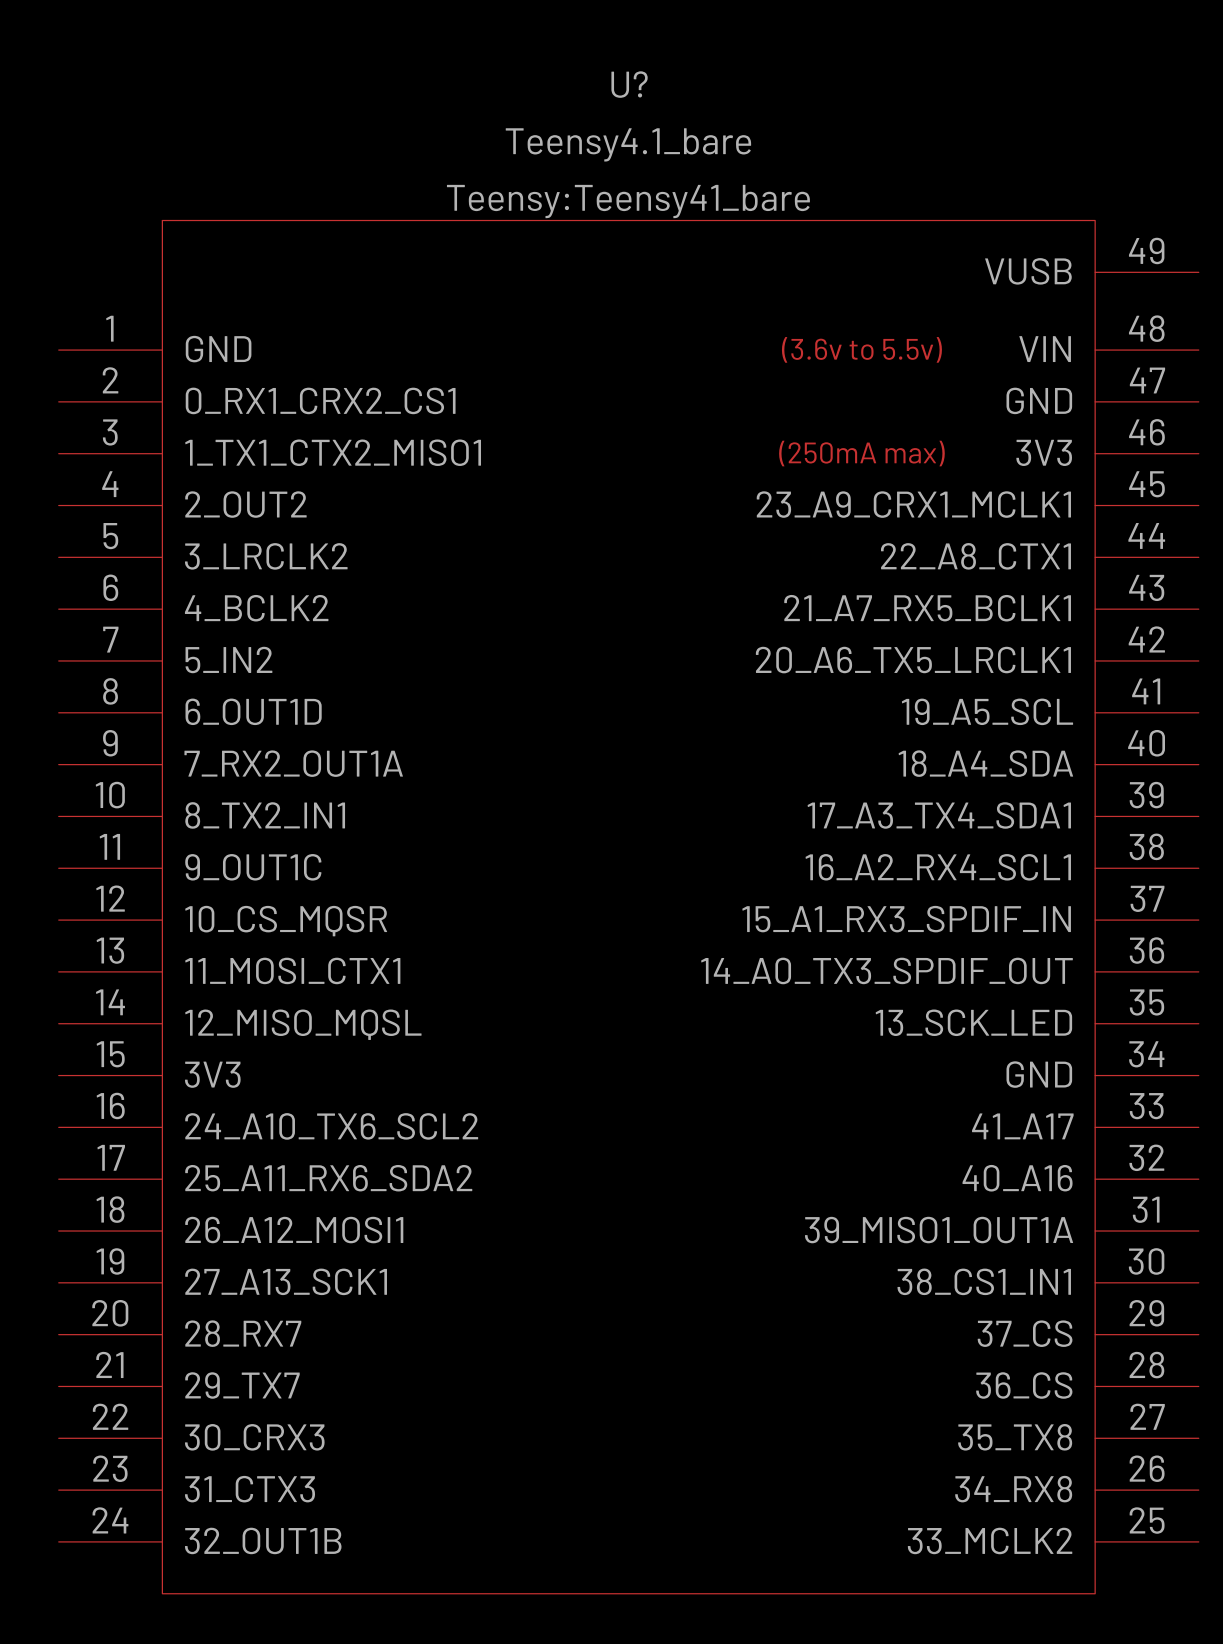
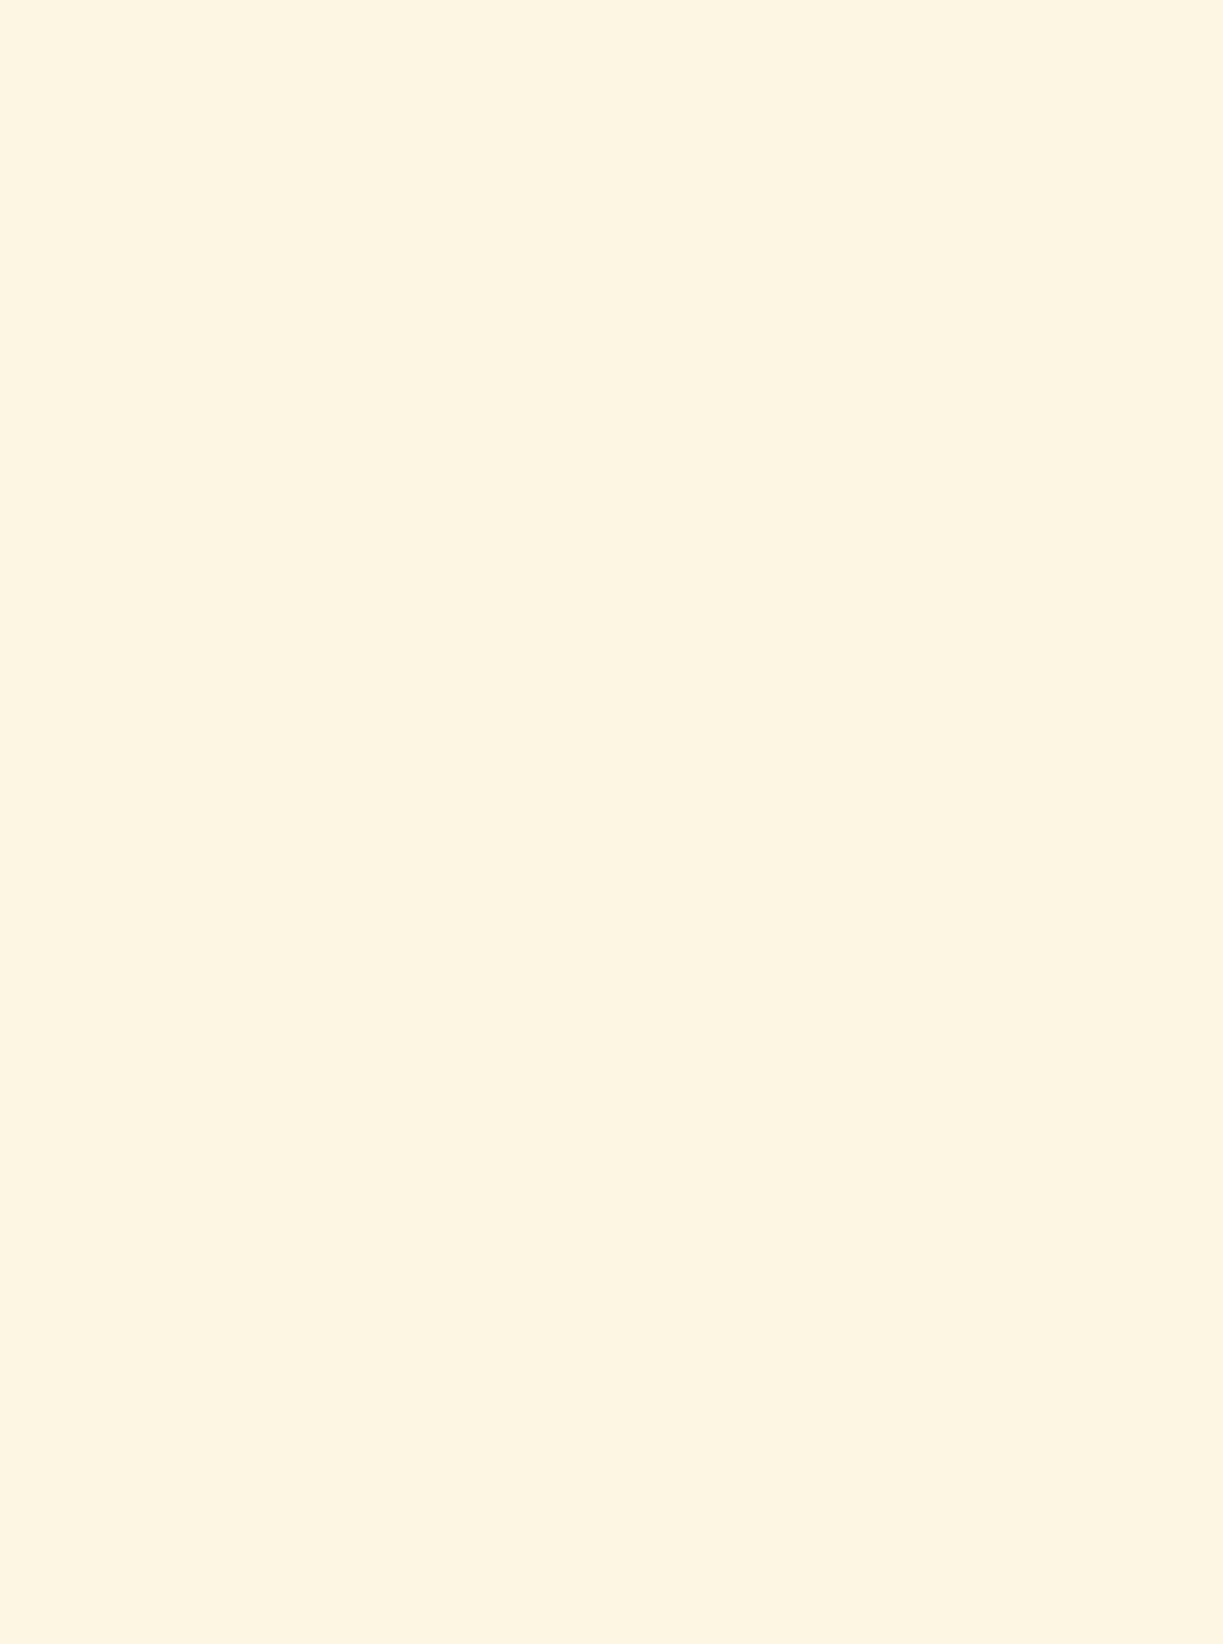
U?: Teensy4.1_bare (628, 907) -> none

